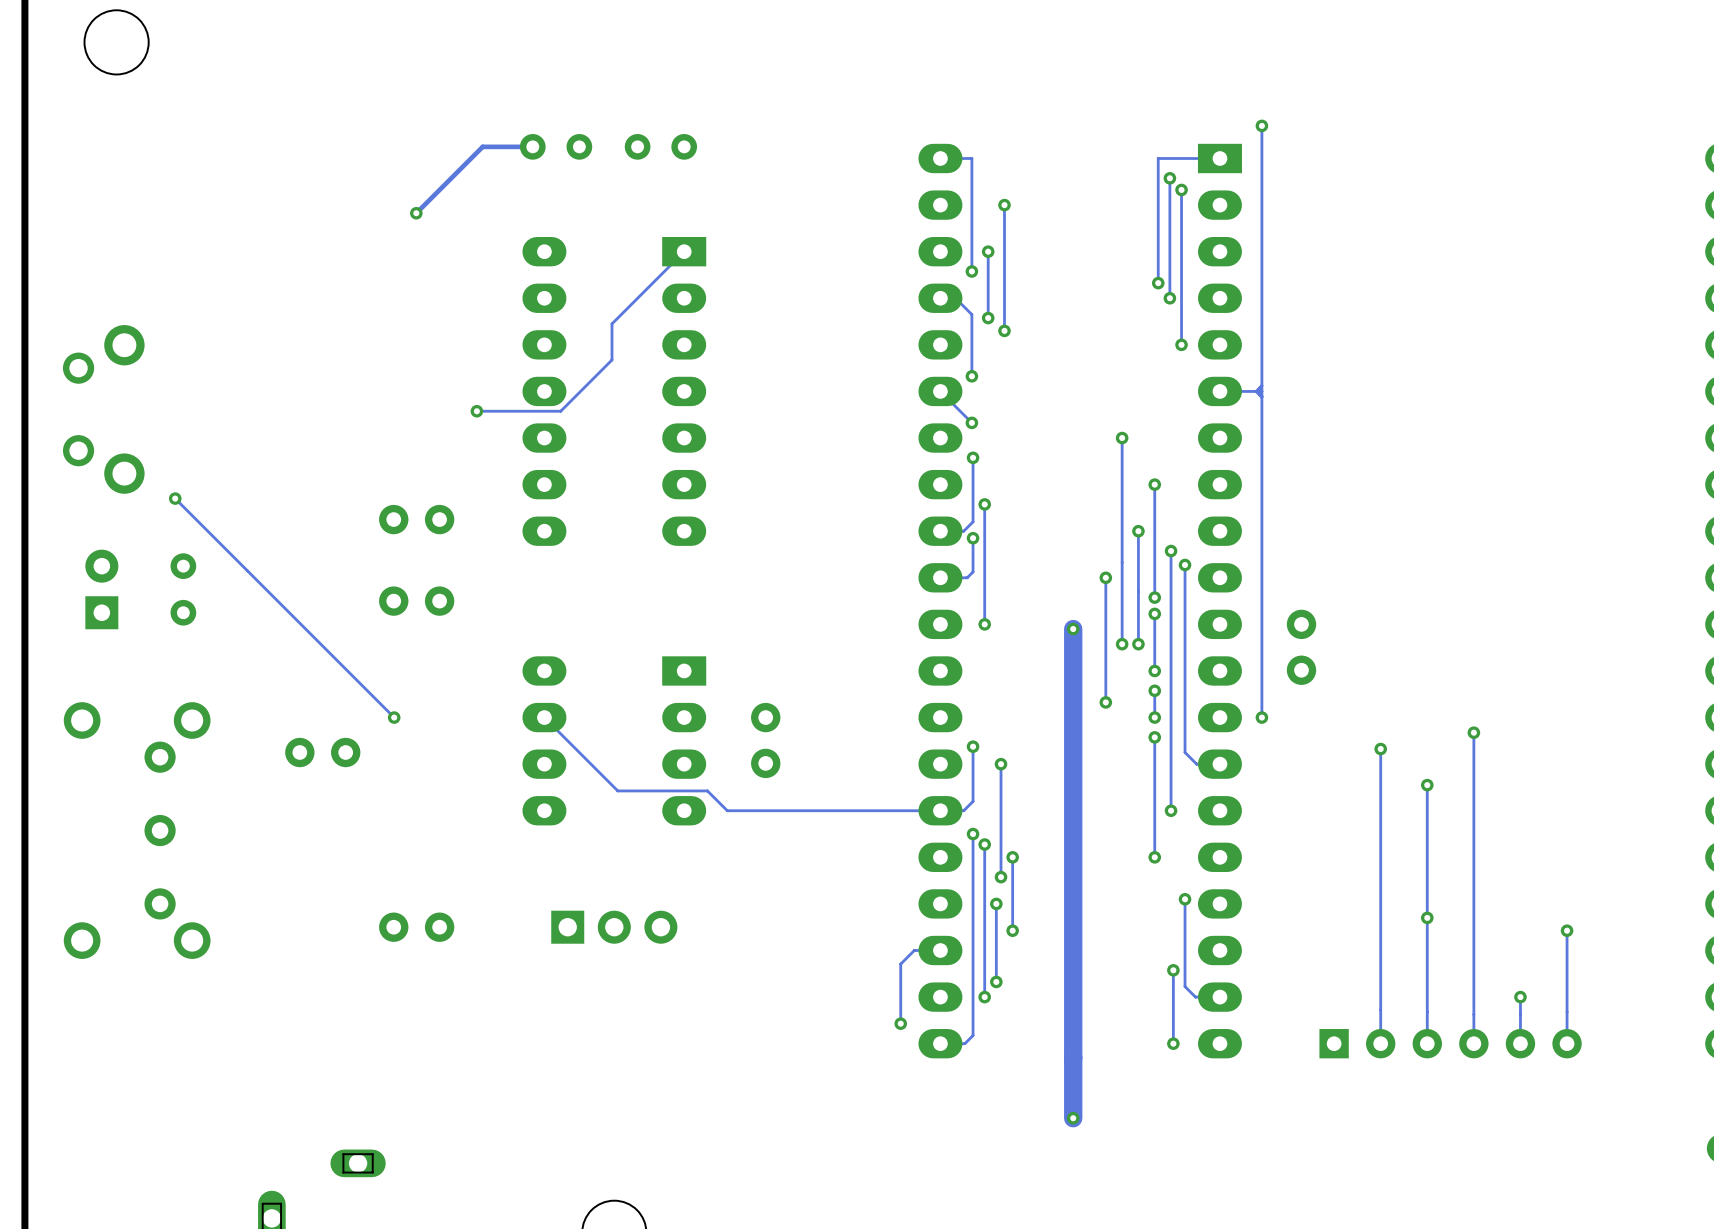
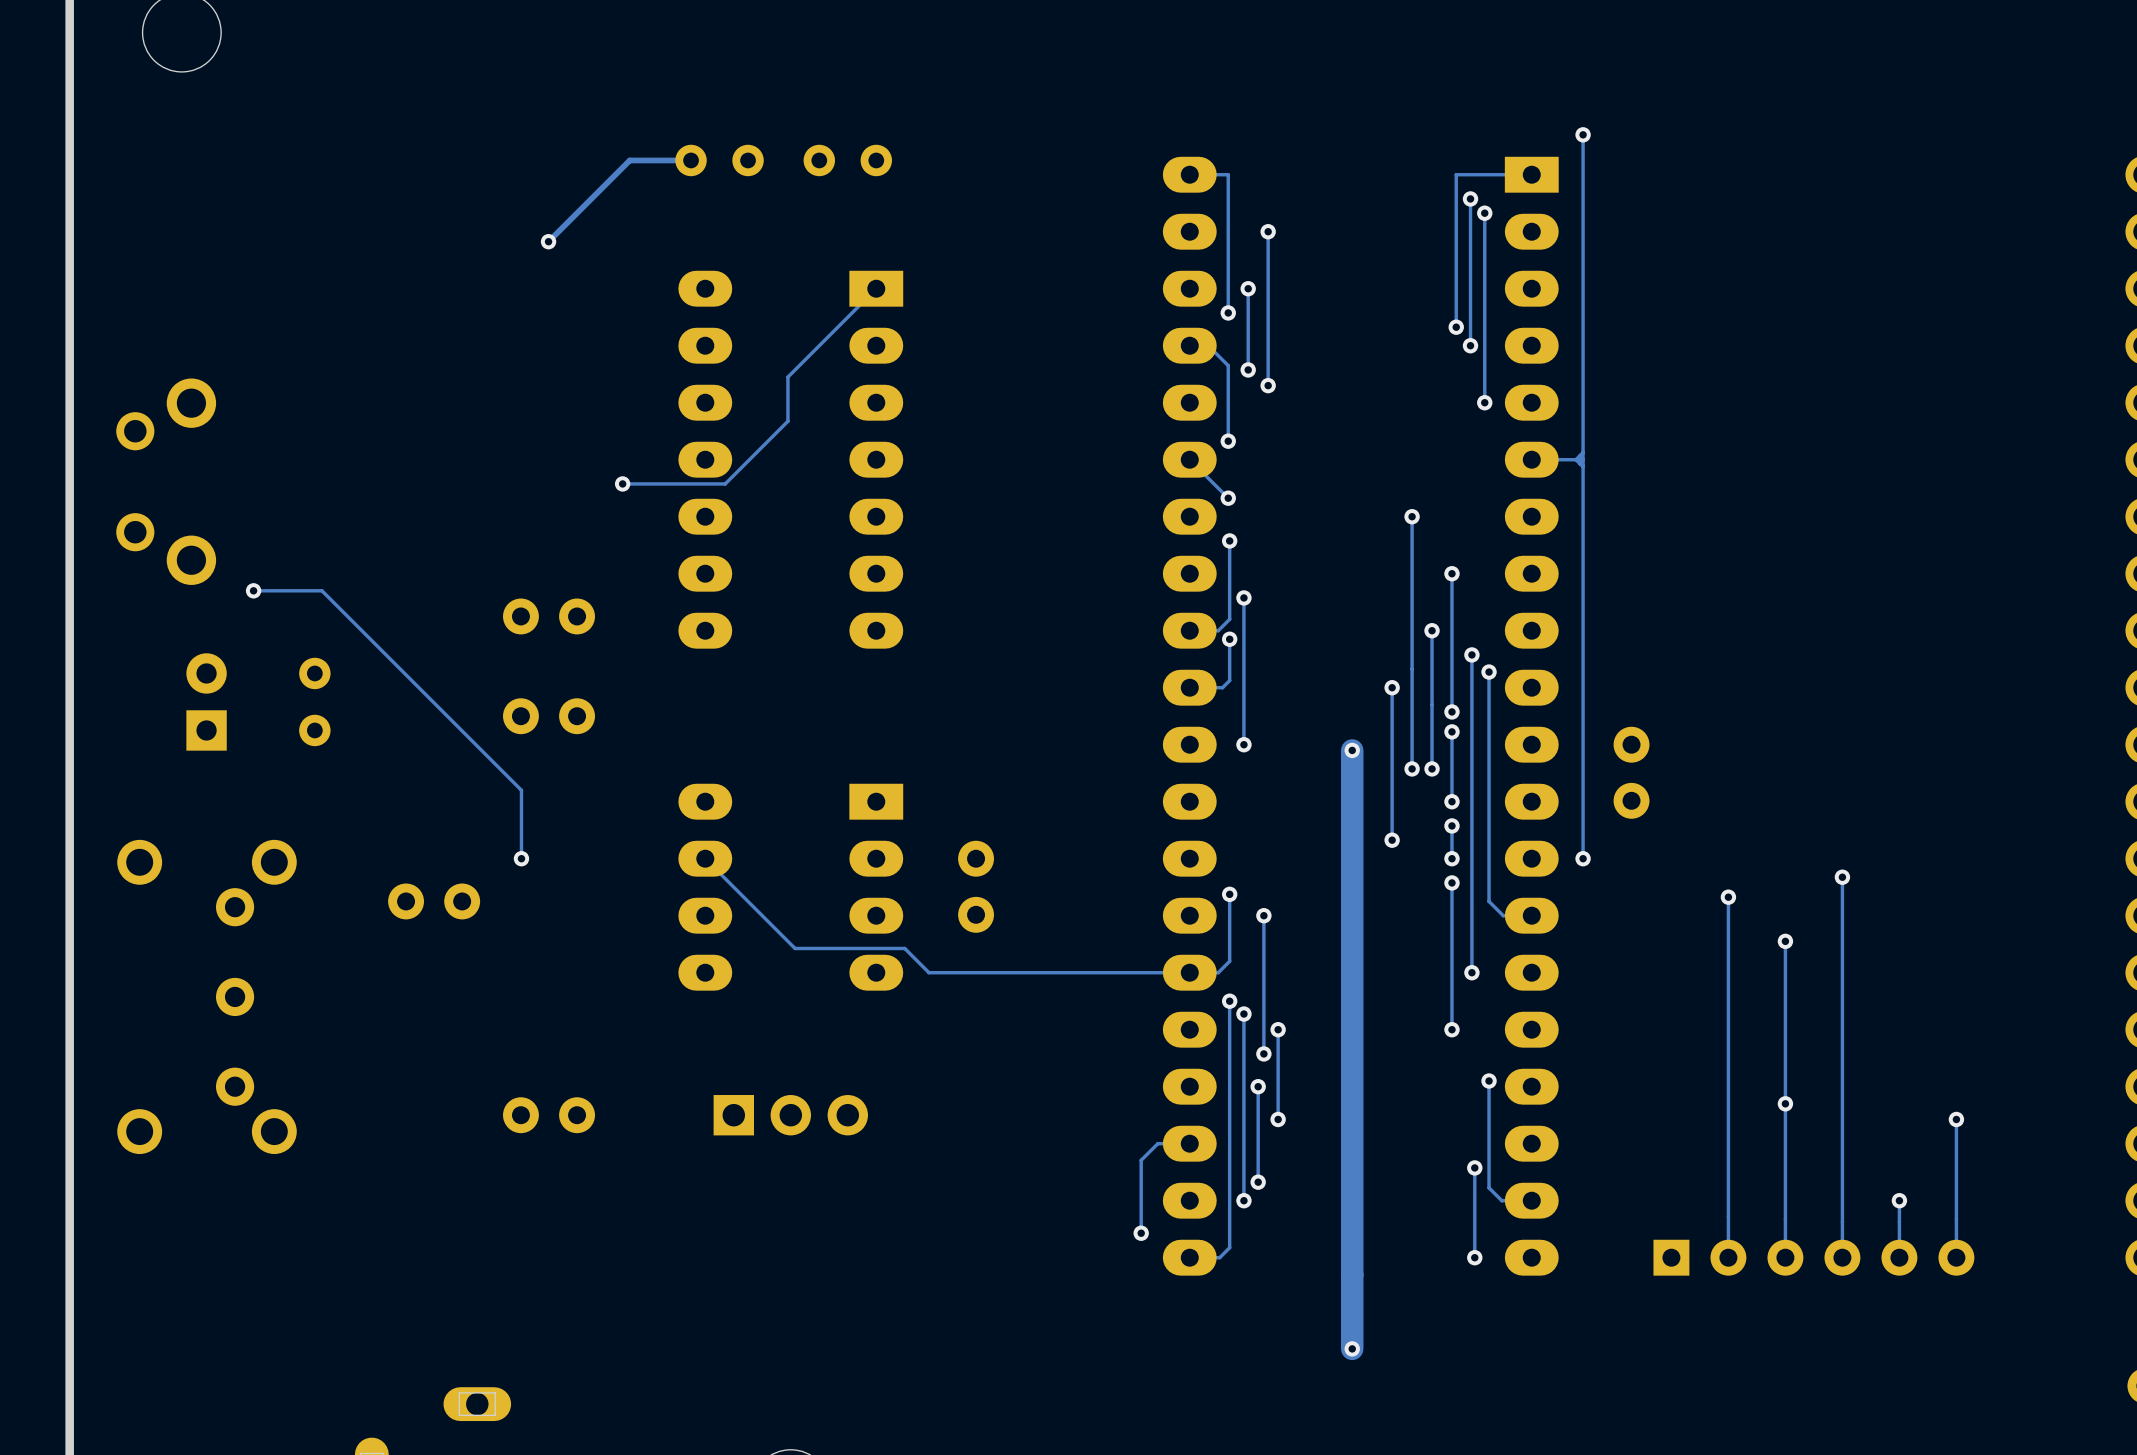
track: (175, 498) (394, 717) -> (253, 590) (321, 590) (521, 790) (521, 858)
part position: (101, 589) -> (206, 701)
part position: (183, 589) -> (314, 701)

